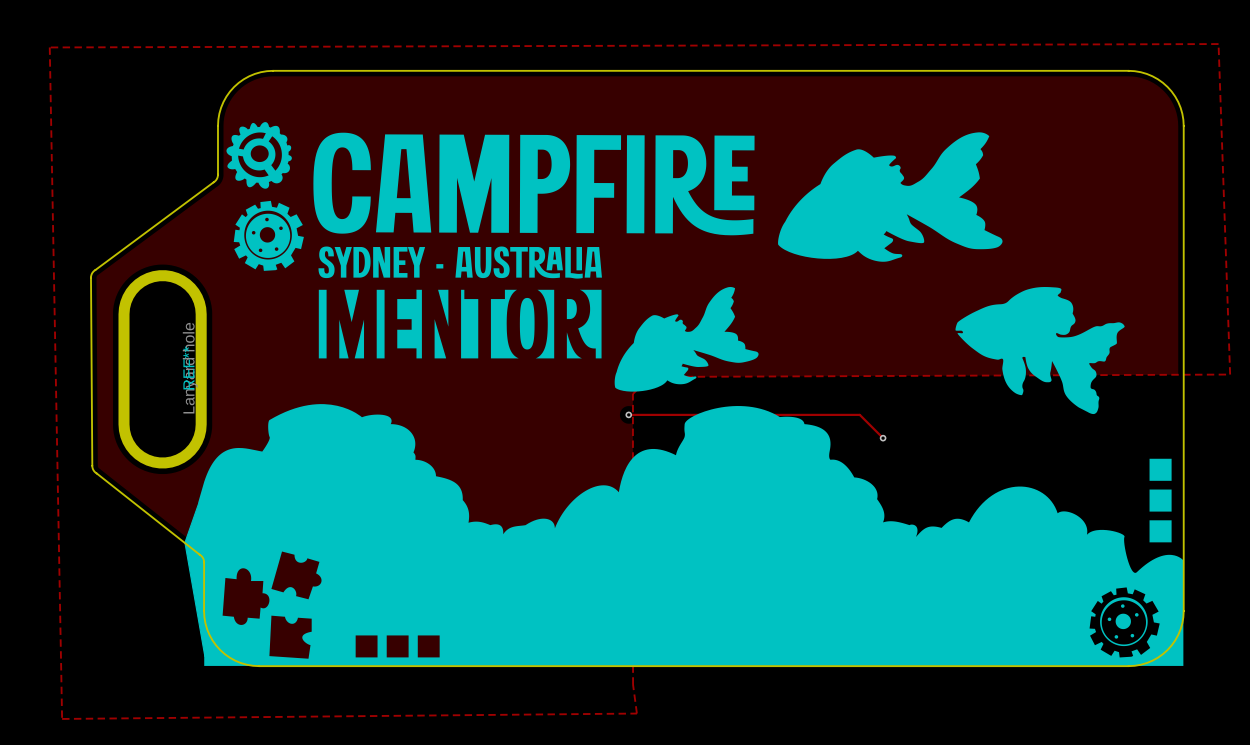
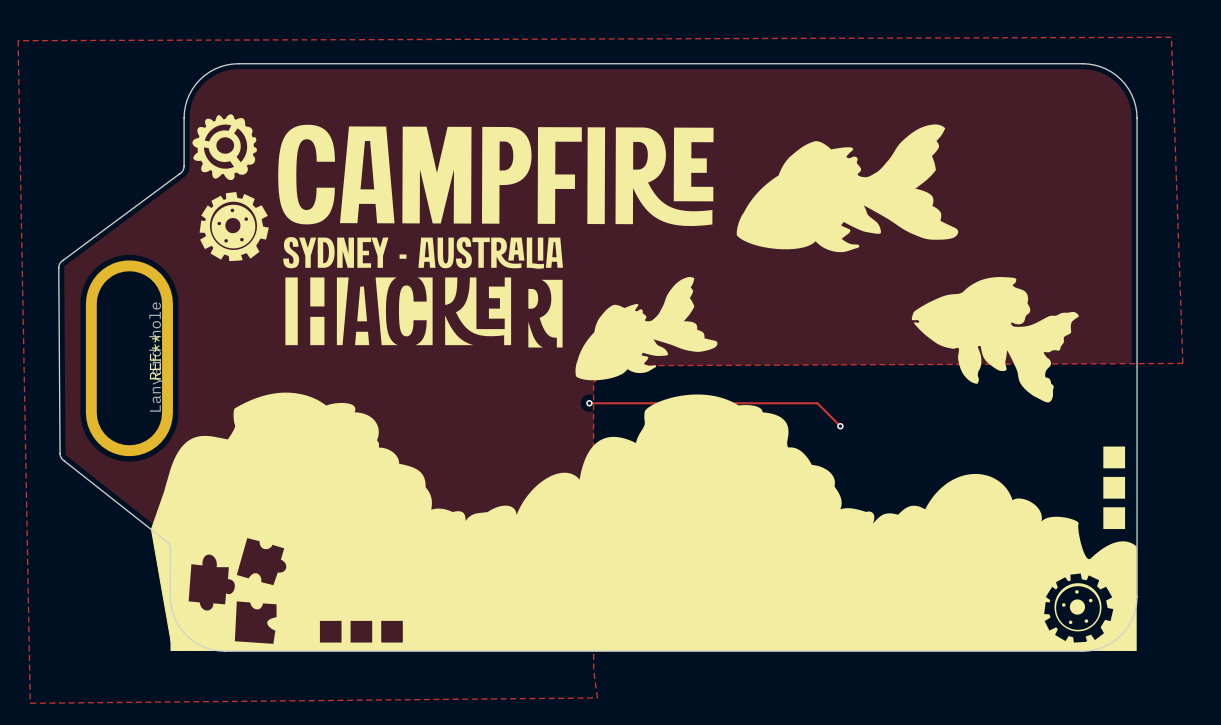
drawing: none -> [355, 277, 474, 346]
drawing shape: [318, 289, 327, 359] -> [285, 277, 298, 346]
drawing shape: [344, 289, 360, 323] -> [310, 277, 325, 307]
drawing shape: [376, 289, 385, 359] -> [336, 277, 349, 346]
drawing: [397, 289, 519, 359] -> none
drawing: [535, 289, 555, 359] -> none
drawing shape: [519, 297, 535, 350] -> [455, 277, 512, 346]
drawing: [339, 319, 365, 359] -> none
drawing: none -> [310, 316, 325, 346]

